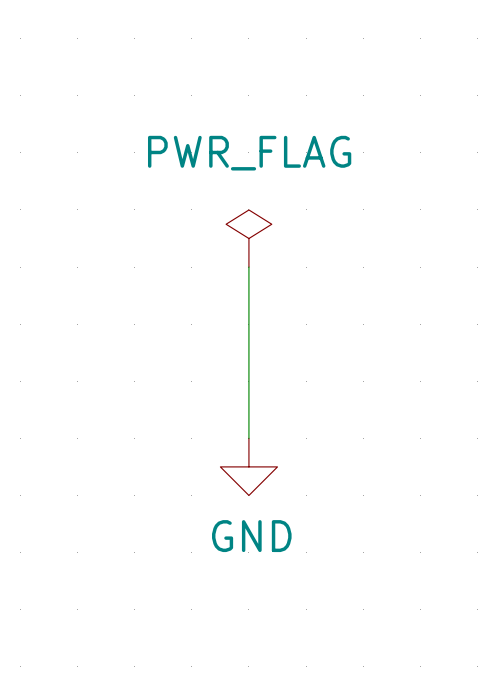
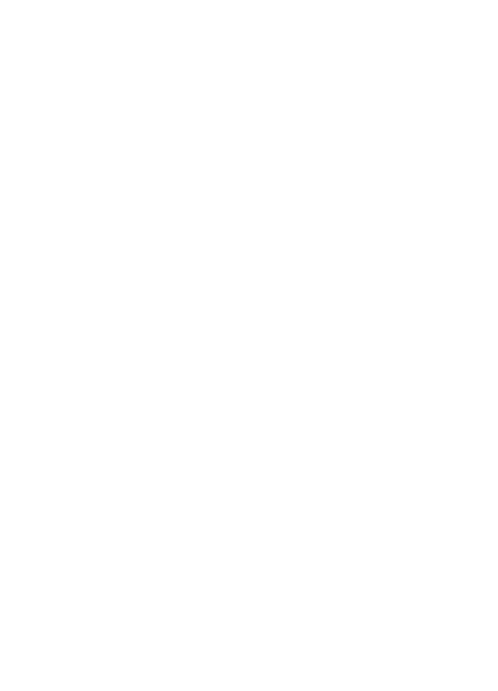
power symbol: PWR_FLAG (248, 238) -> none
wire: (248, 267) (248, 438) -> none
power symbol: GND (248, 466) -> none

